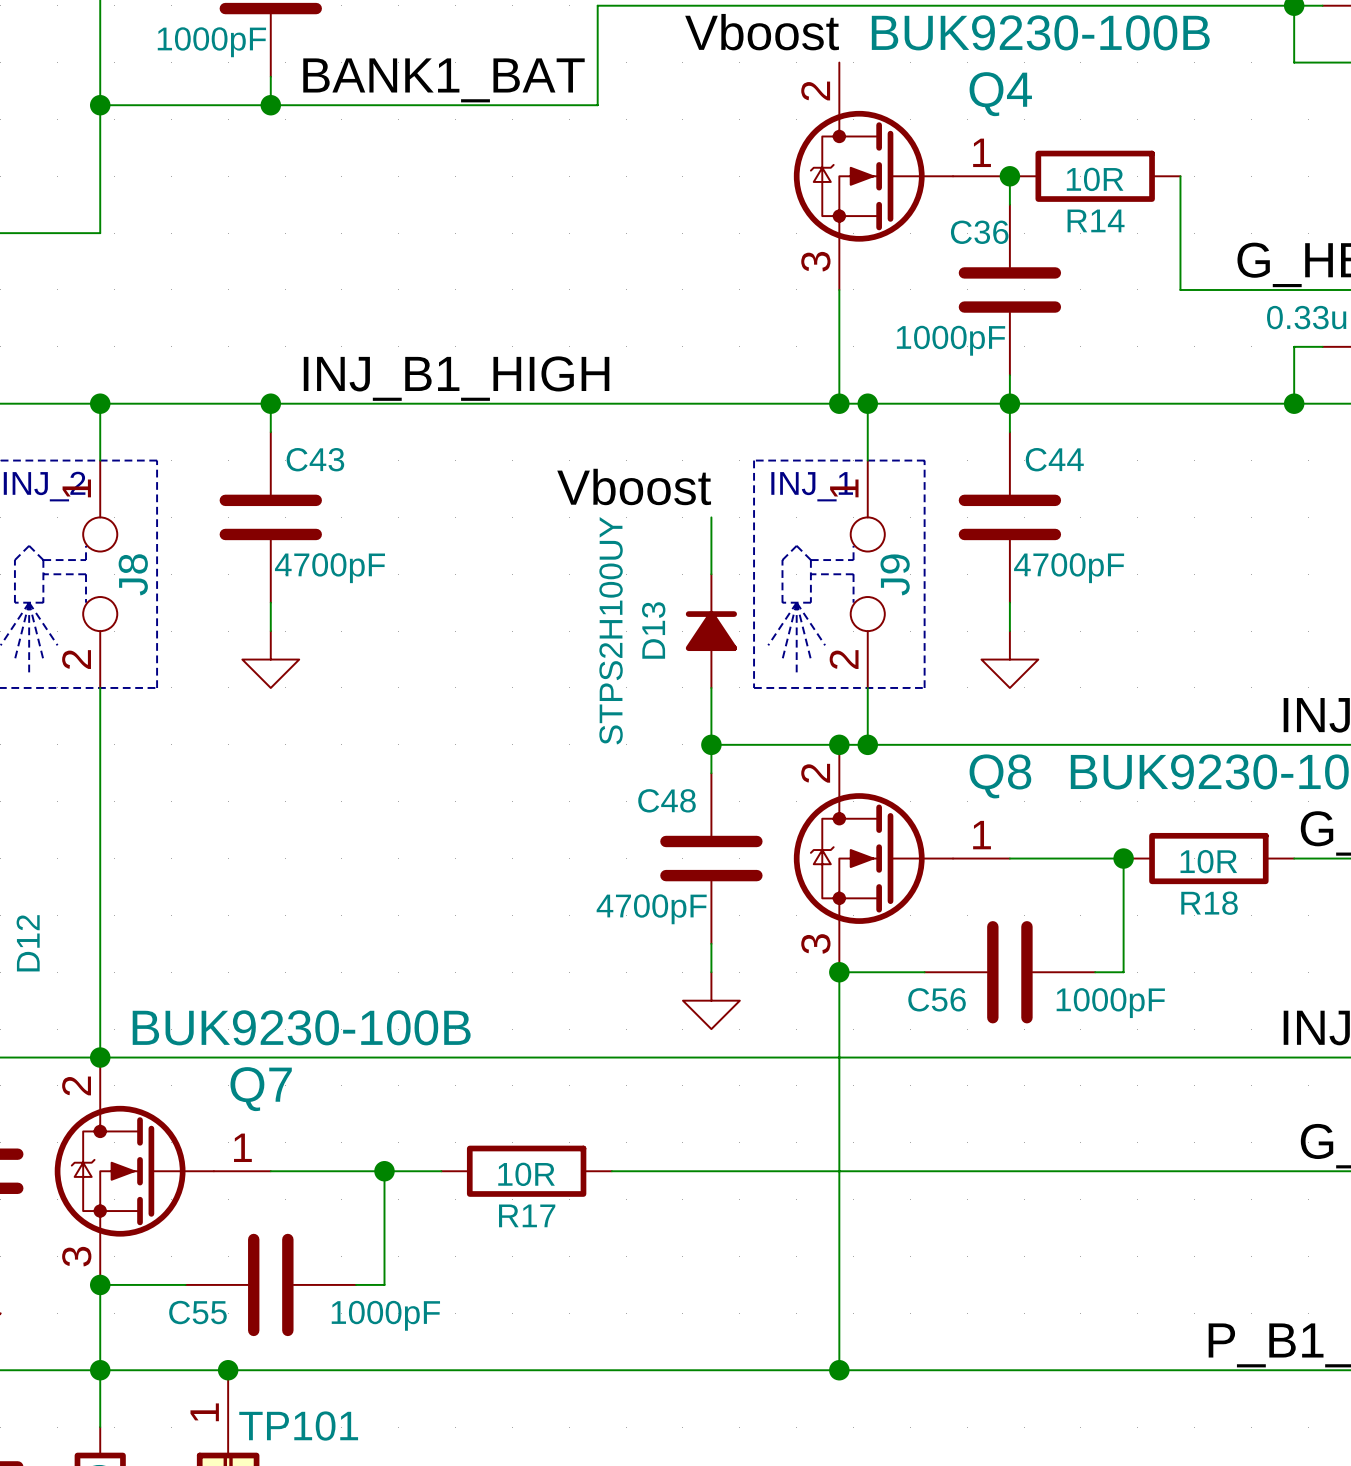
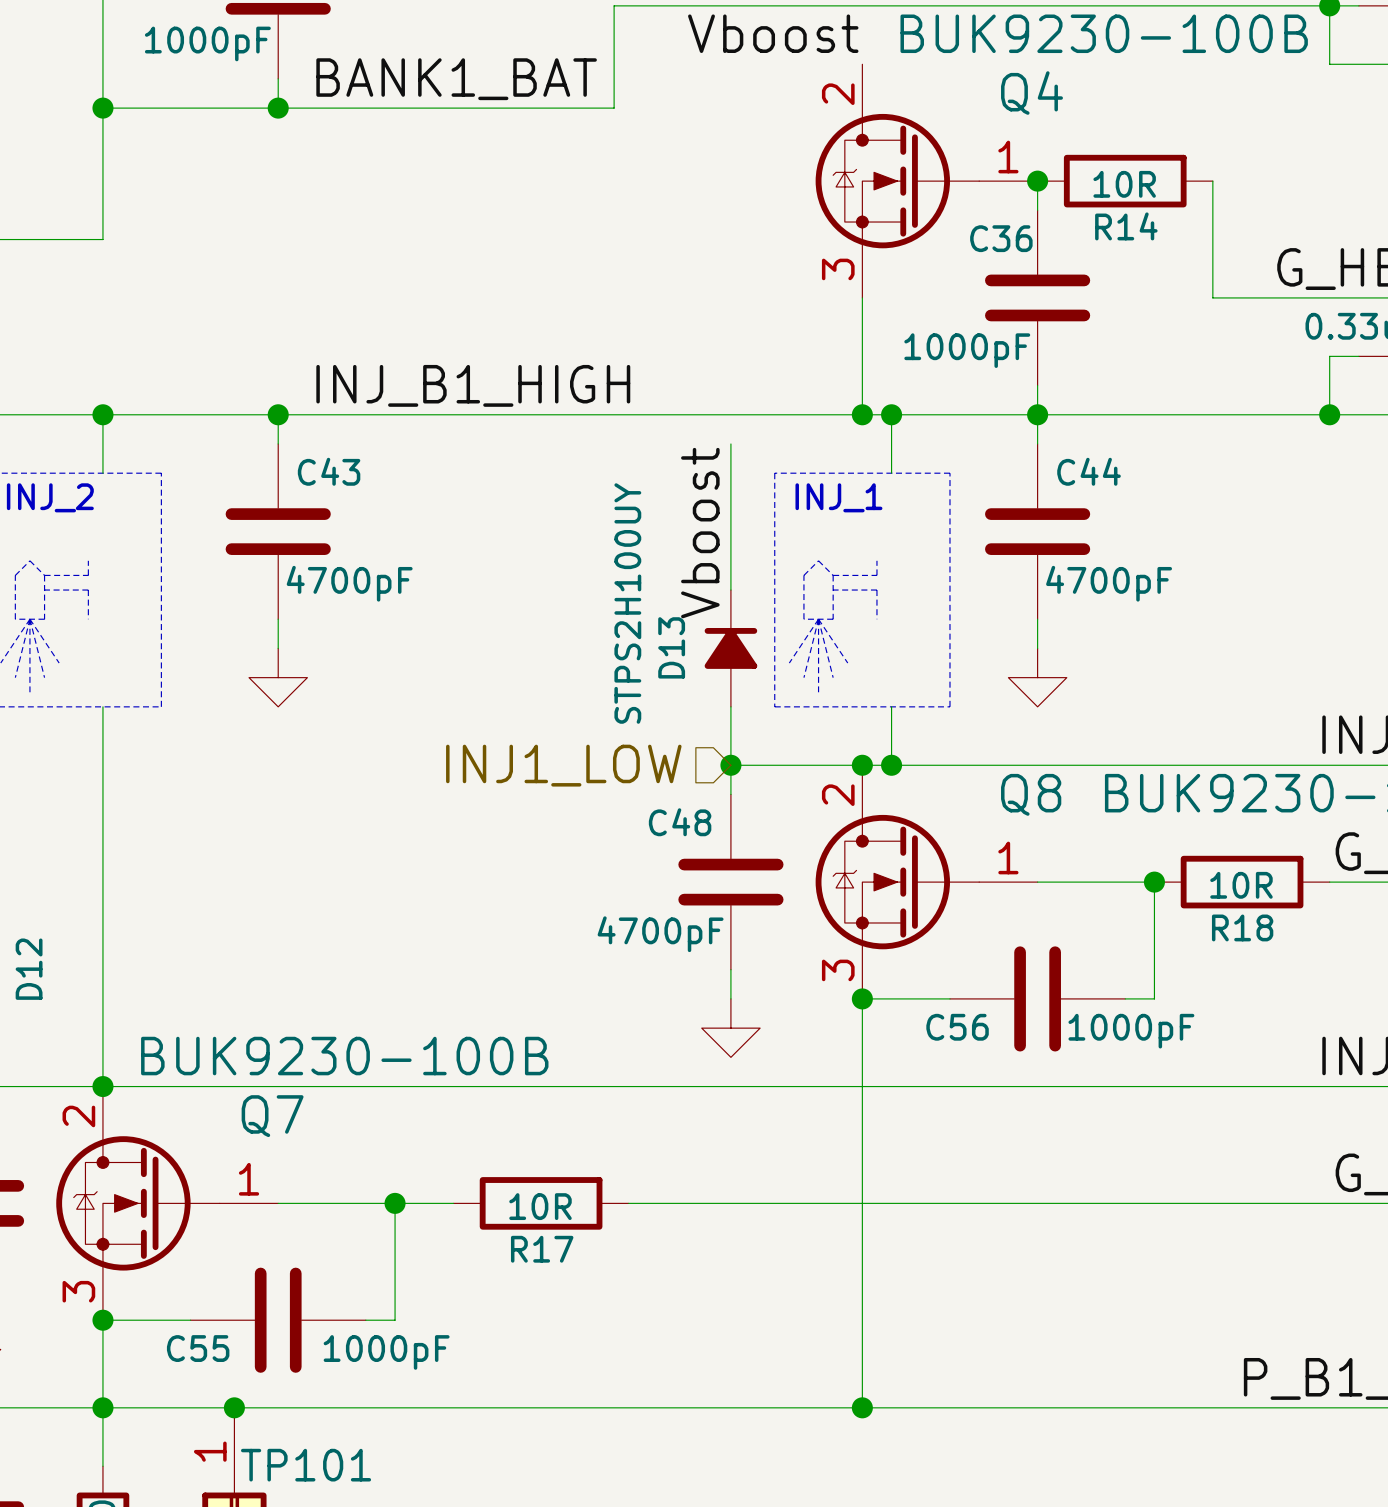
wire: none -> (730, 443) (730, 531)
label rotation: 0° (634, 486) -> 90° counterclockwise (700, 533)
J8: (100, 574) -> none
J9: (867, 574) -> none
D13 value position: STPS2H100UY (611, 630) -> STPS2H100UY (627, 603)
hierarchical label: none -> INJ1_LOW (563, 765)

